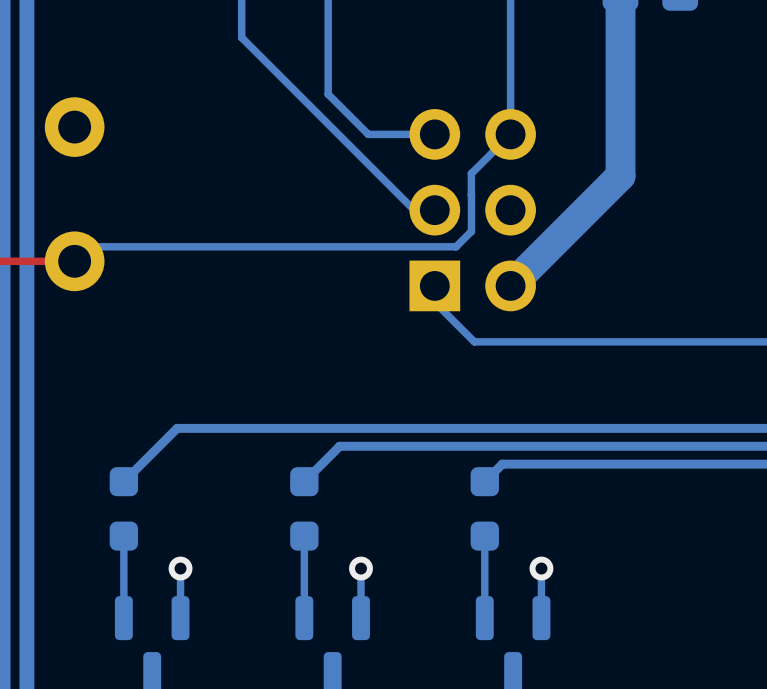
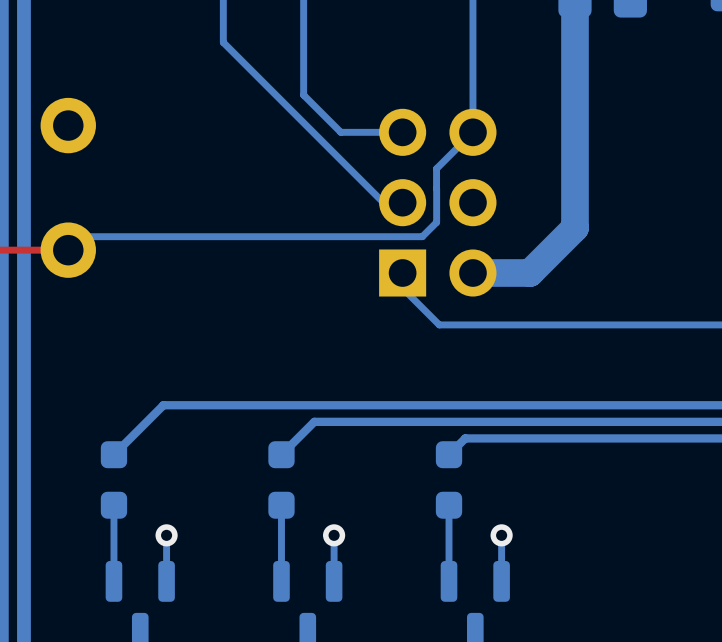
bottom track: (620, 176) (510, 285) -> (574, 170) (574, 228) (530, 273) (472, 273)

